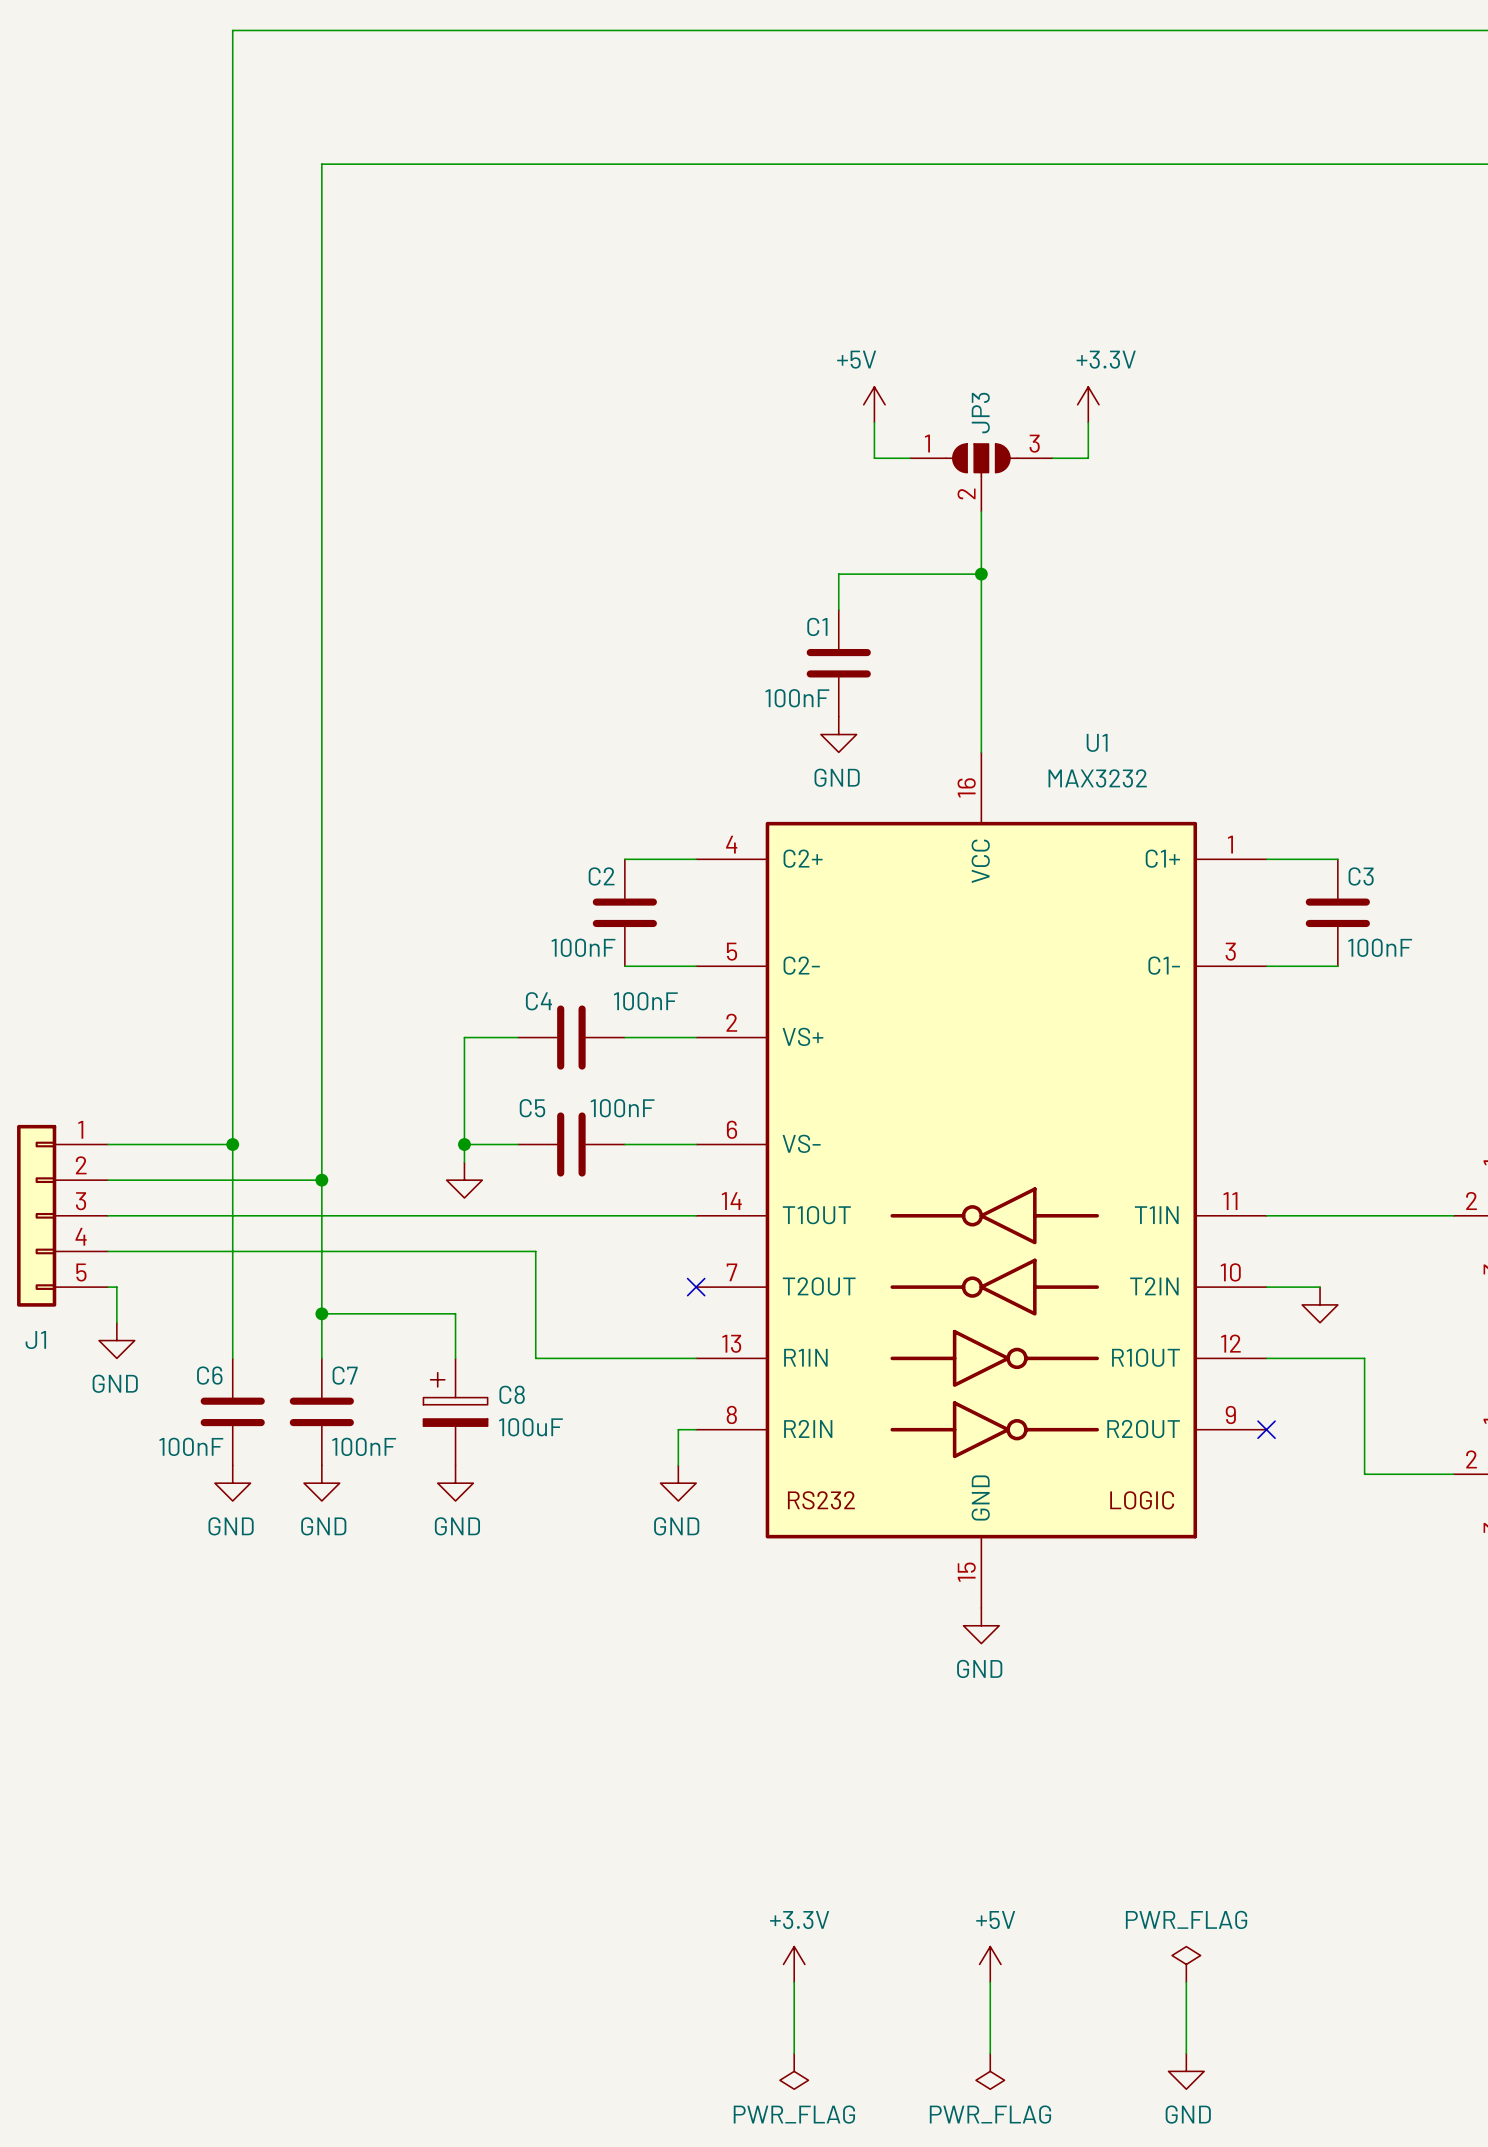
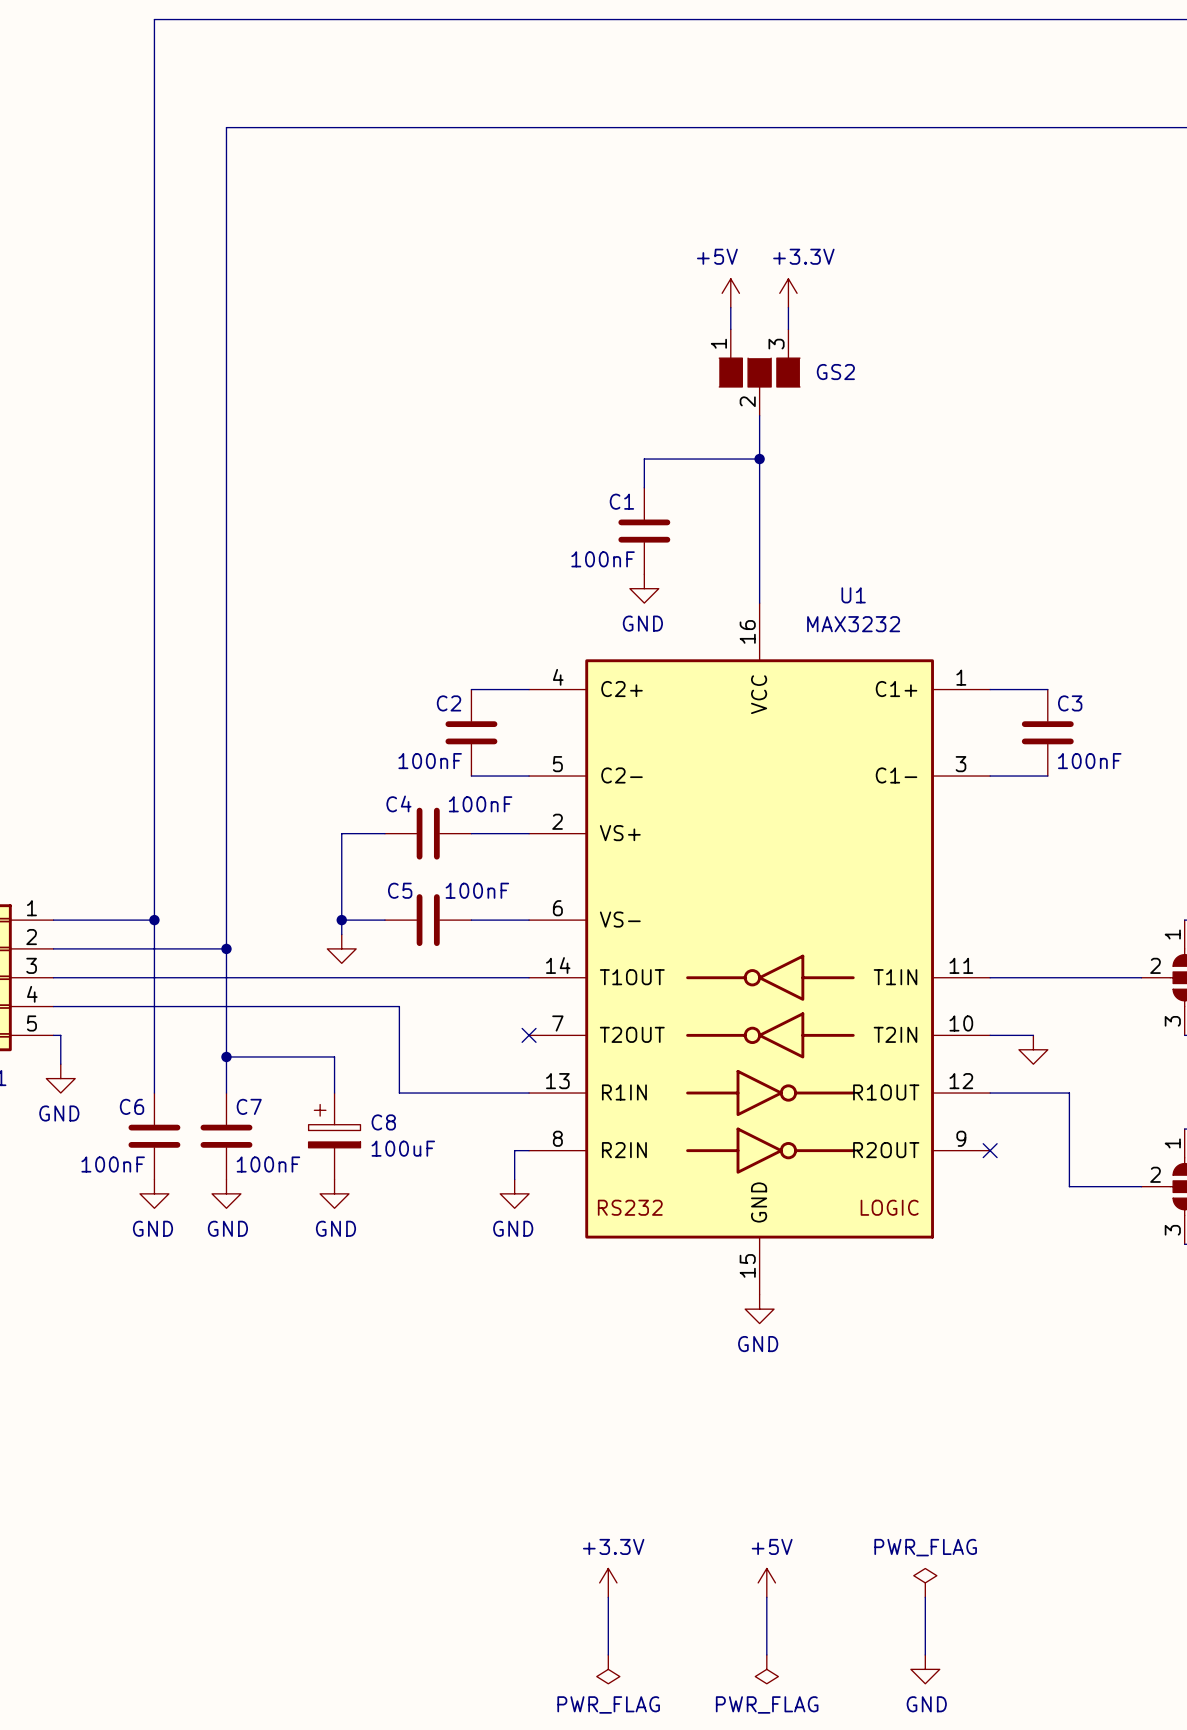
wire: none -> (730, 307) (730, 329)
wire: none -> (788, 307) (788, 329)
power symbol position: +5V (874, 404) -> +5V (730, 293)
power symbol position: +3.3V (1088, 404) -> +3.3V (788, 293)
wire: (874, 422) (874, 458) (910, 458) -> none
wire: (1088, 422) (1088, 458) (1052, 458) -> none
GS2: none -> (759, 372)
JP3: (981, 477) -> none

